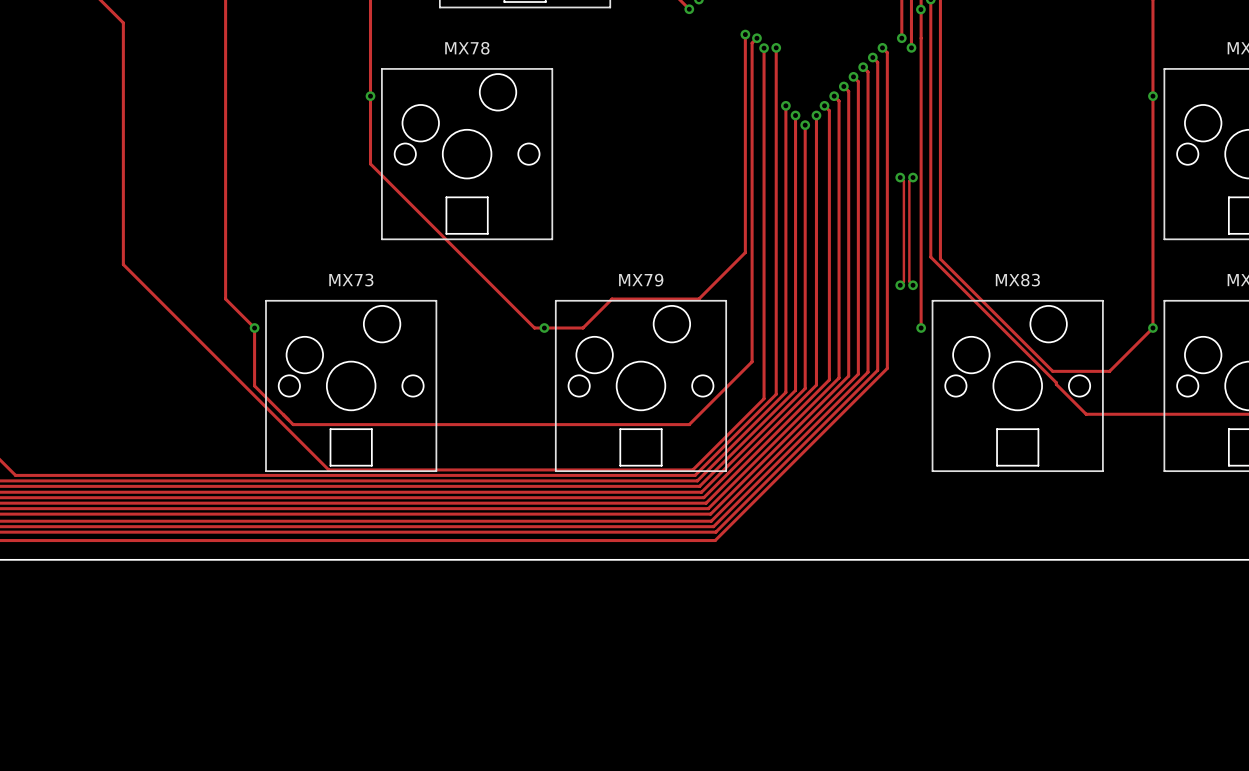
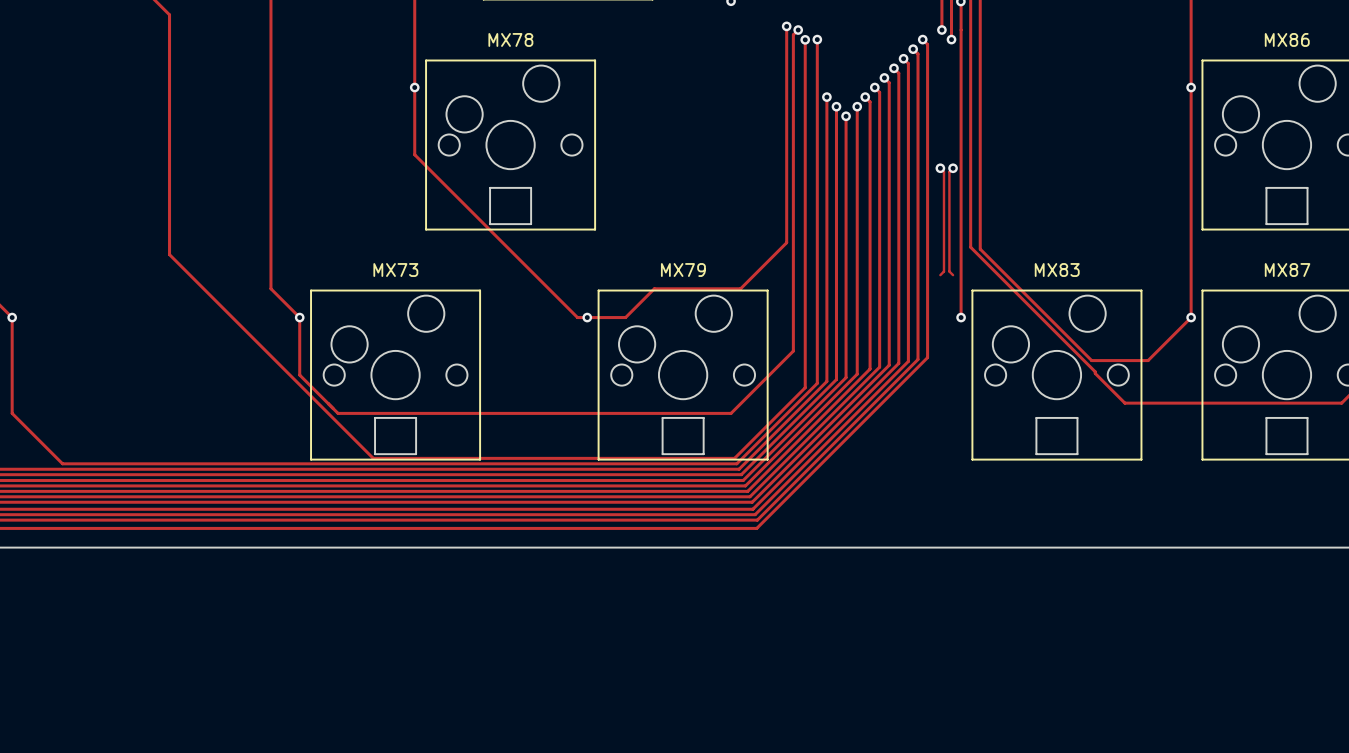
via: (900, 285) -> none
via: (913, 285) -> none

